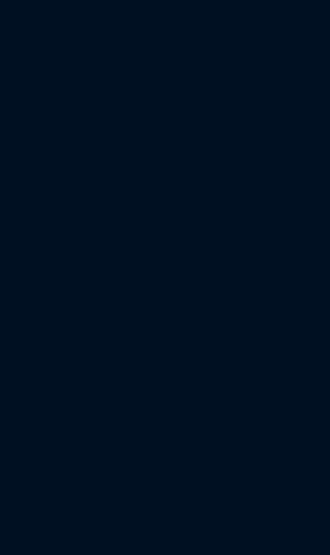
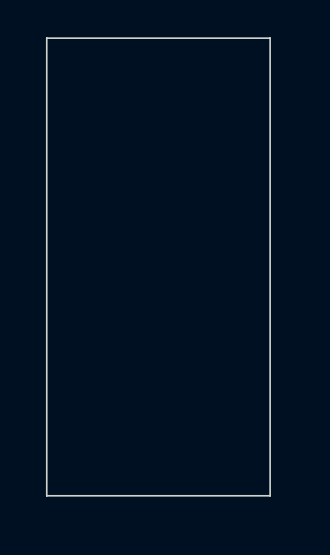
board edge: none -> (46, 38) (270, 38) (270, 495) (46, 495) (46, 38)

